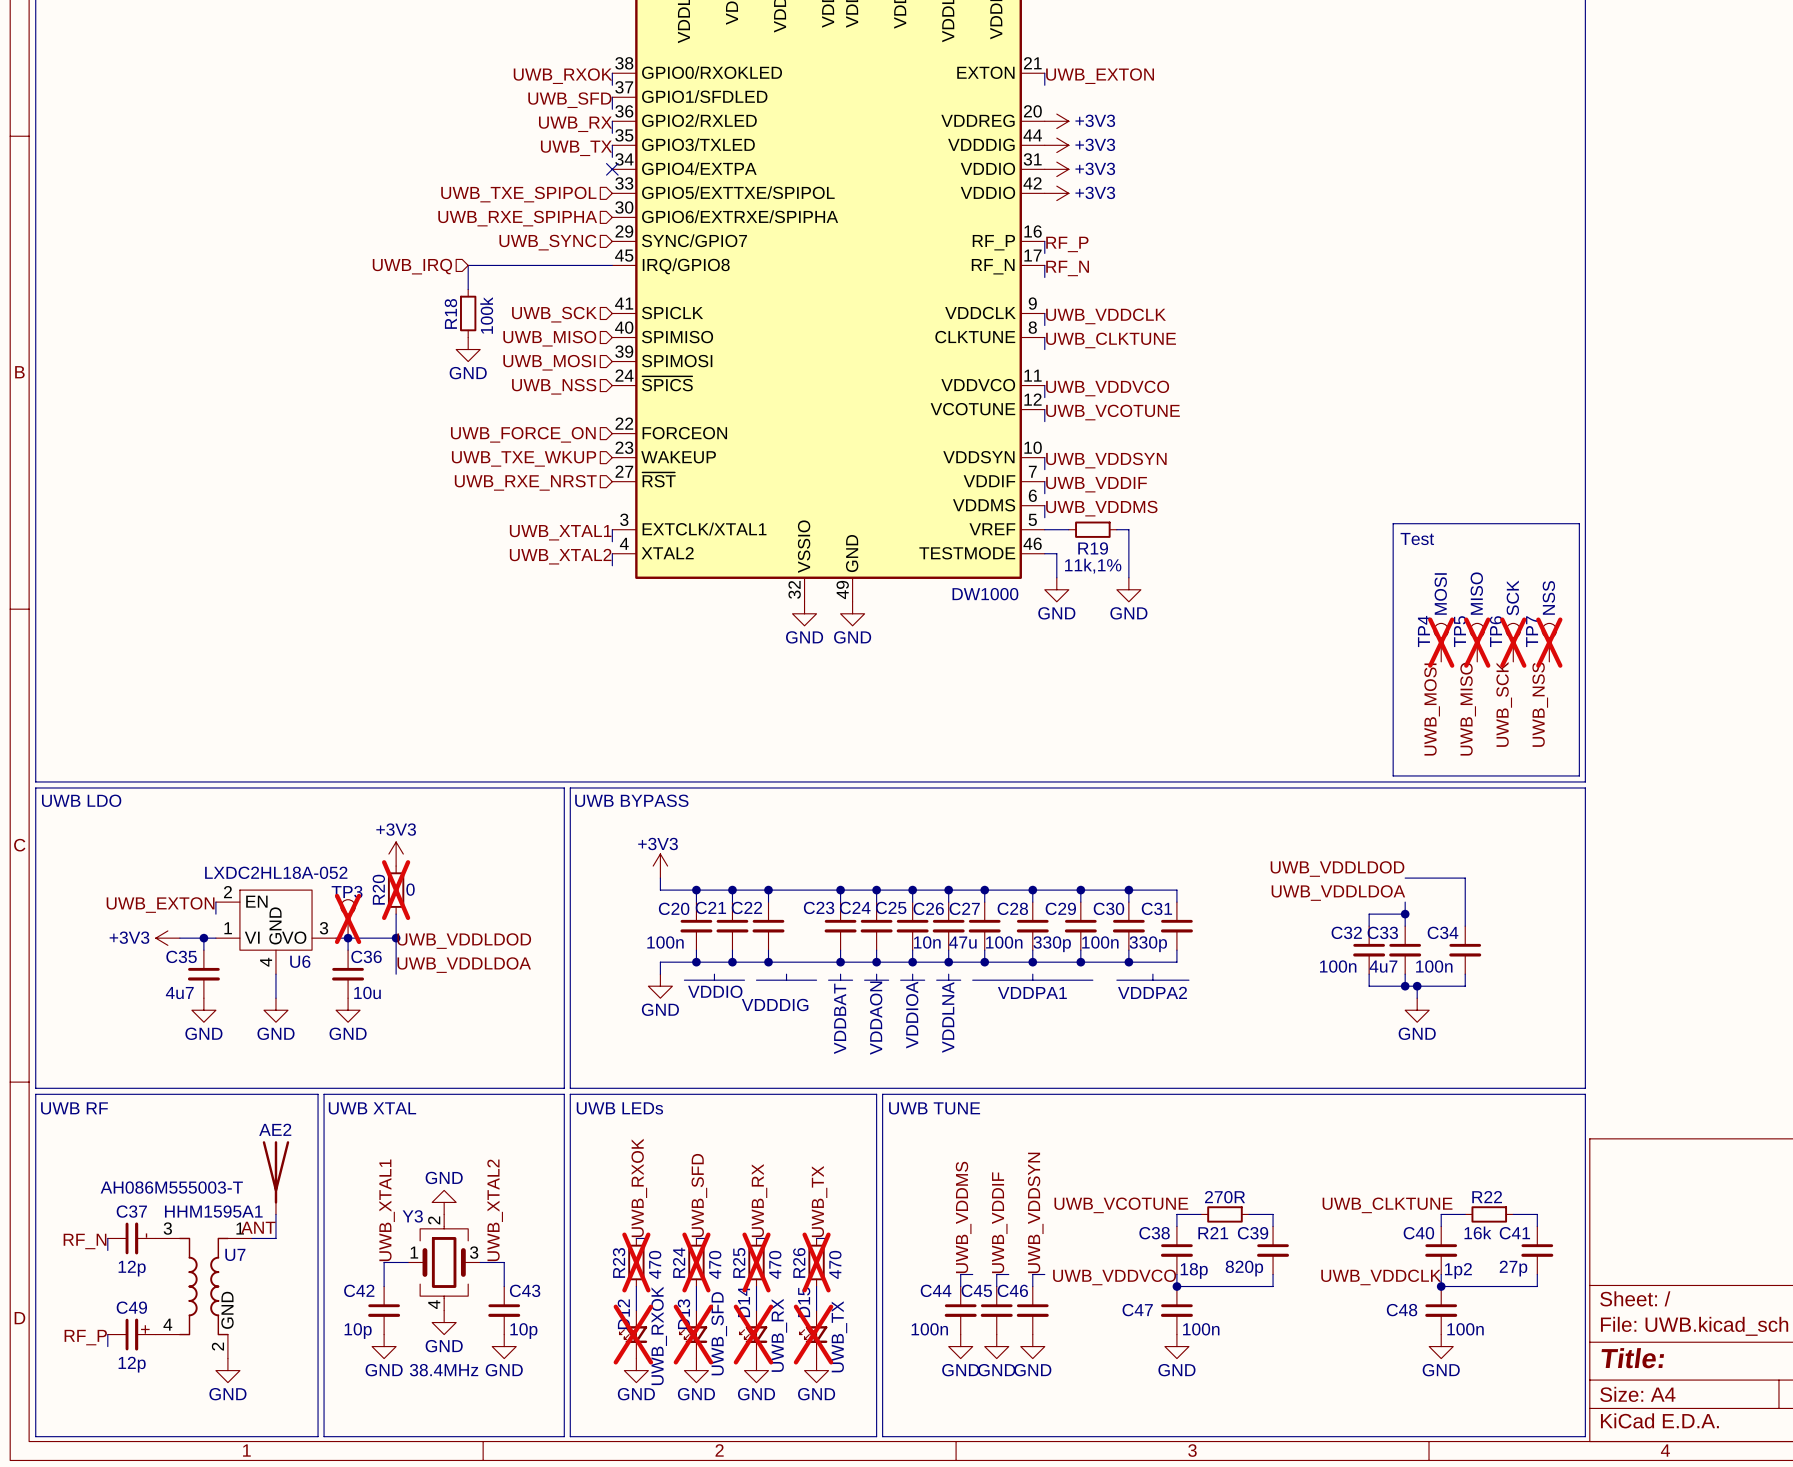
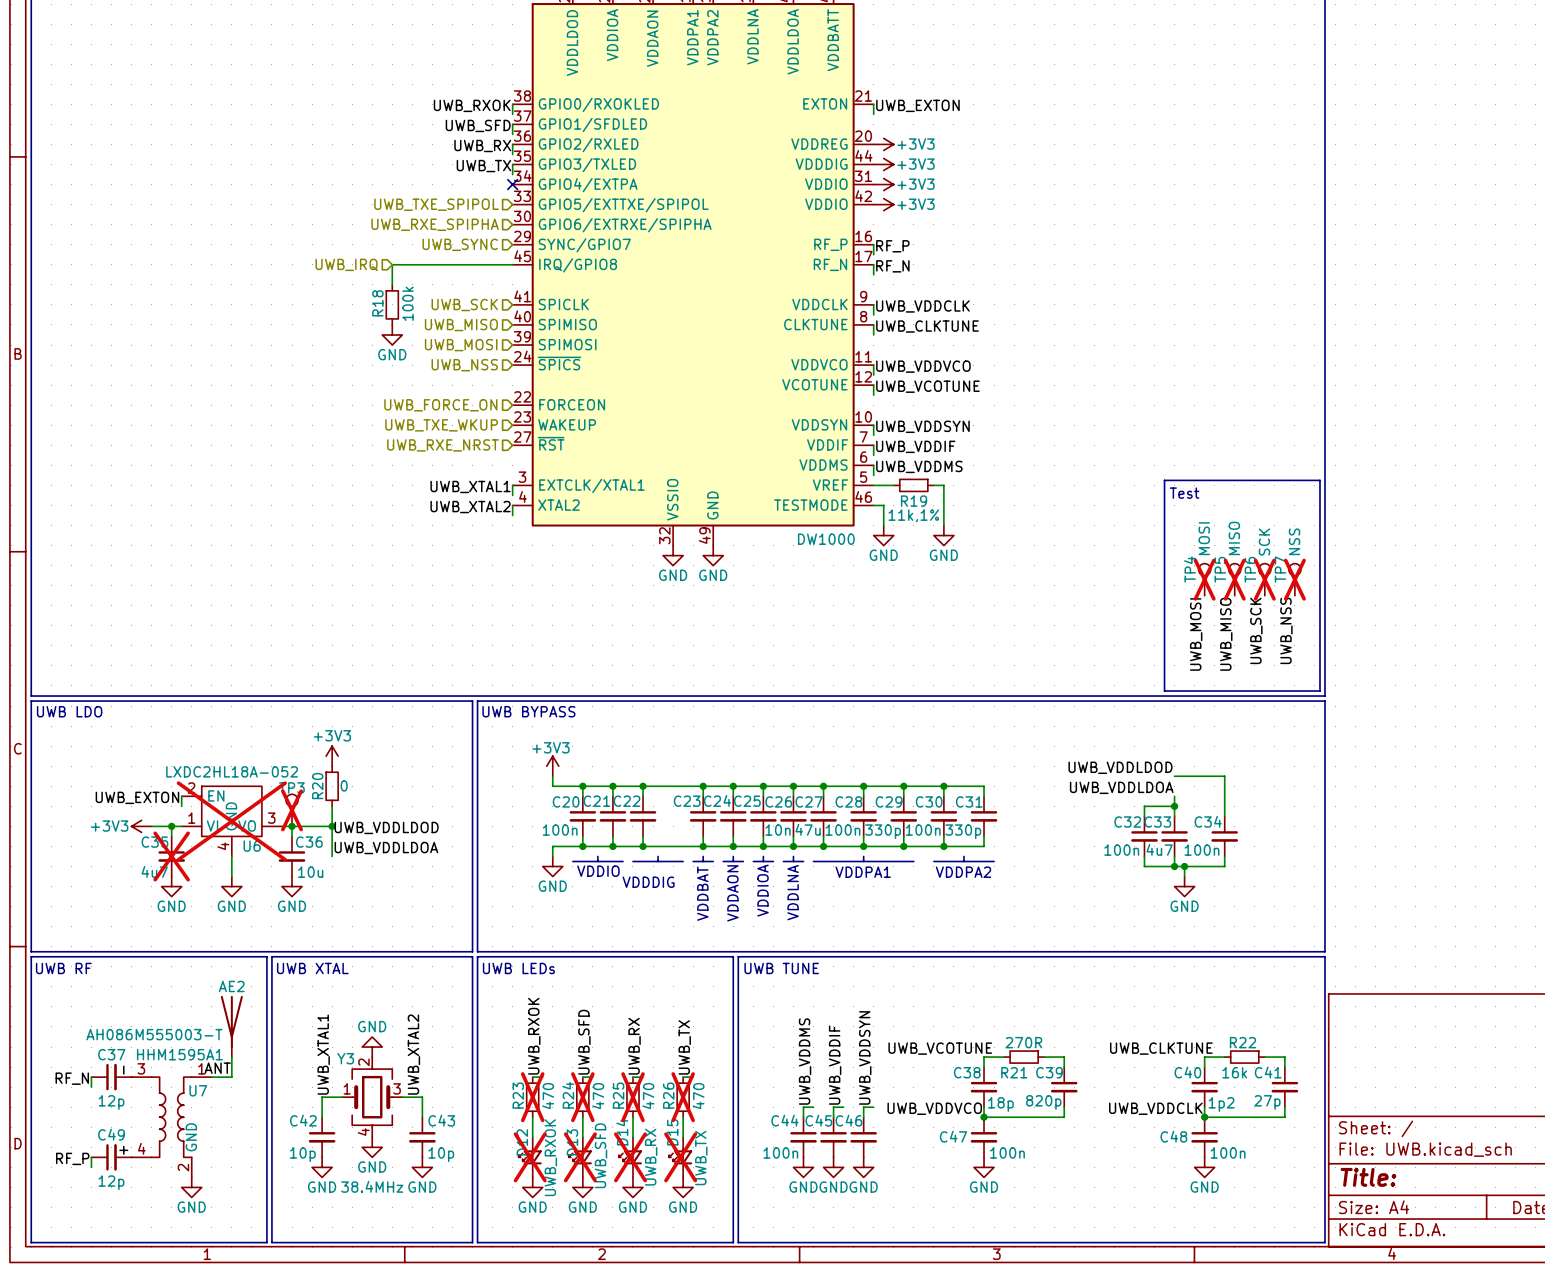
R20 do-not-place cross: (396, 890) -> none
U6 do-not-place cross: none -> (231, 821)
C35 do-not-place cross: none -> (171, 856)

